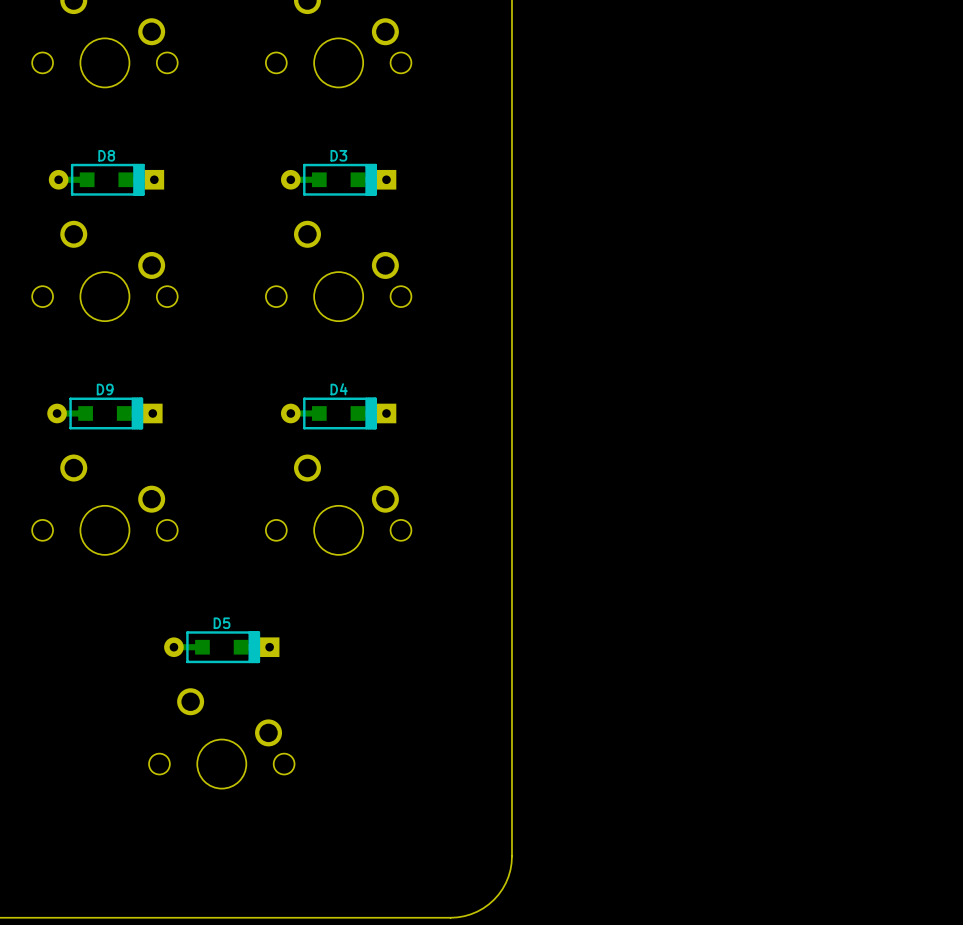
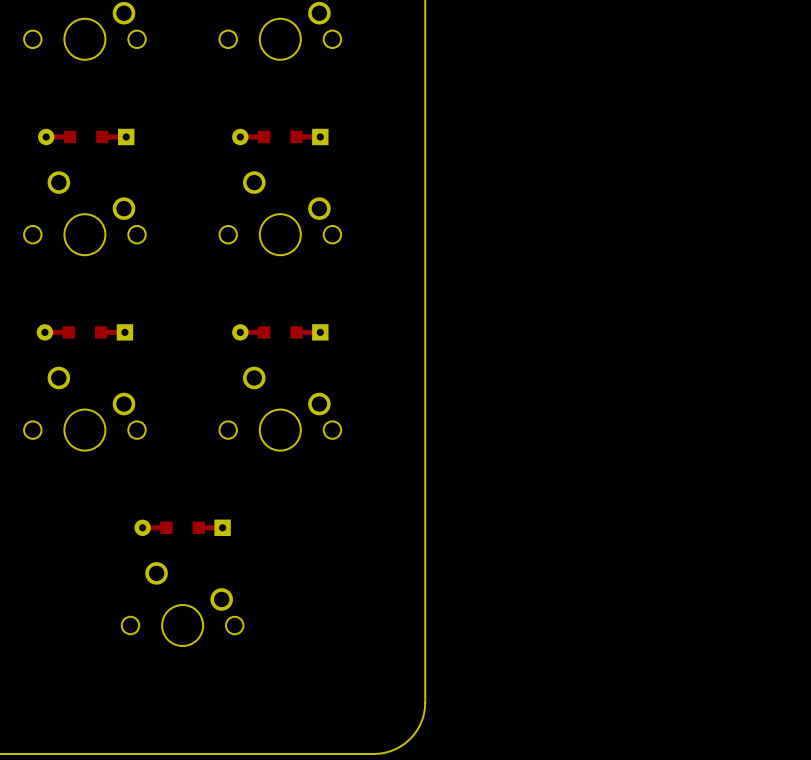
D8 side: bottom (106, 179) -> top (86, 136)
D3 side: bottom (338, 179) -> top (280, 136)
D9 side: bottom (104, 413) -> top (84, 332)
D4 side: bottom (338, 413) -> top (280, 332)
D5 side: bottom (221, 647) -> top (182, 527)

